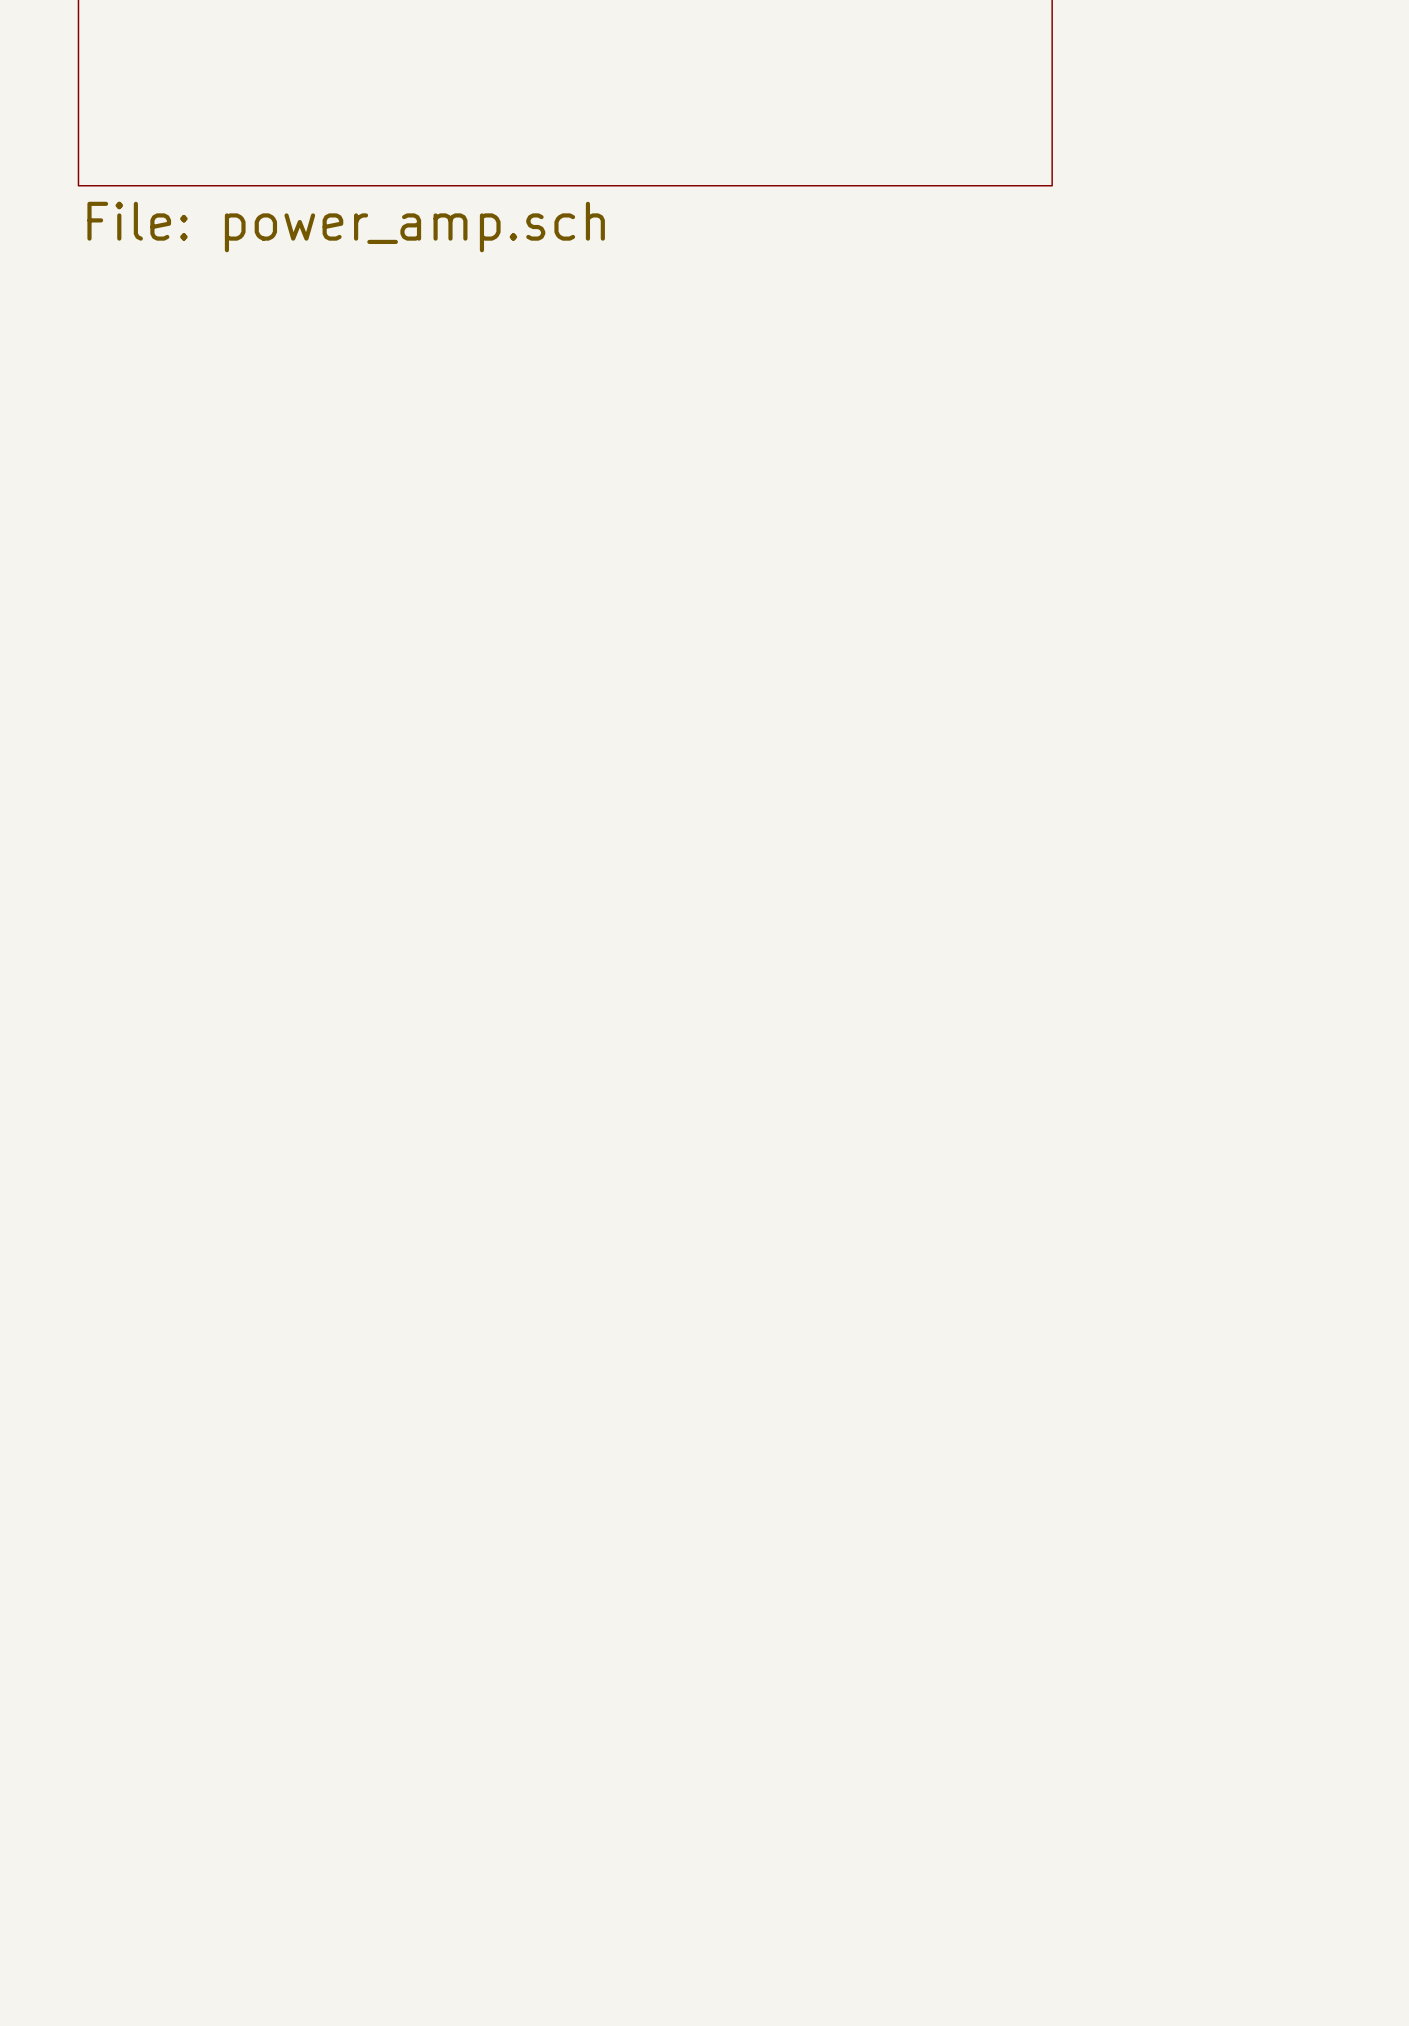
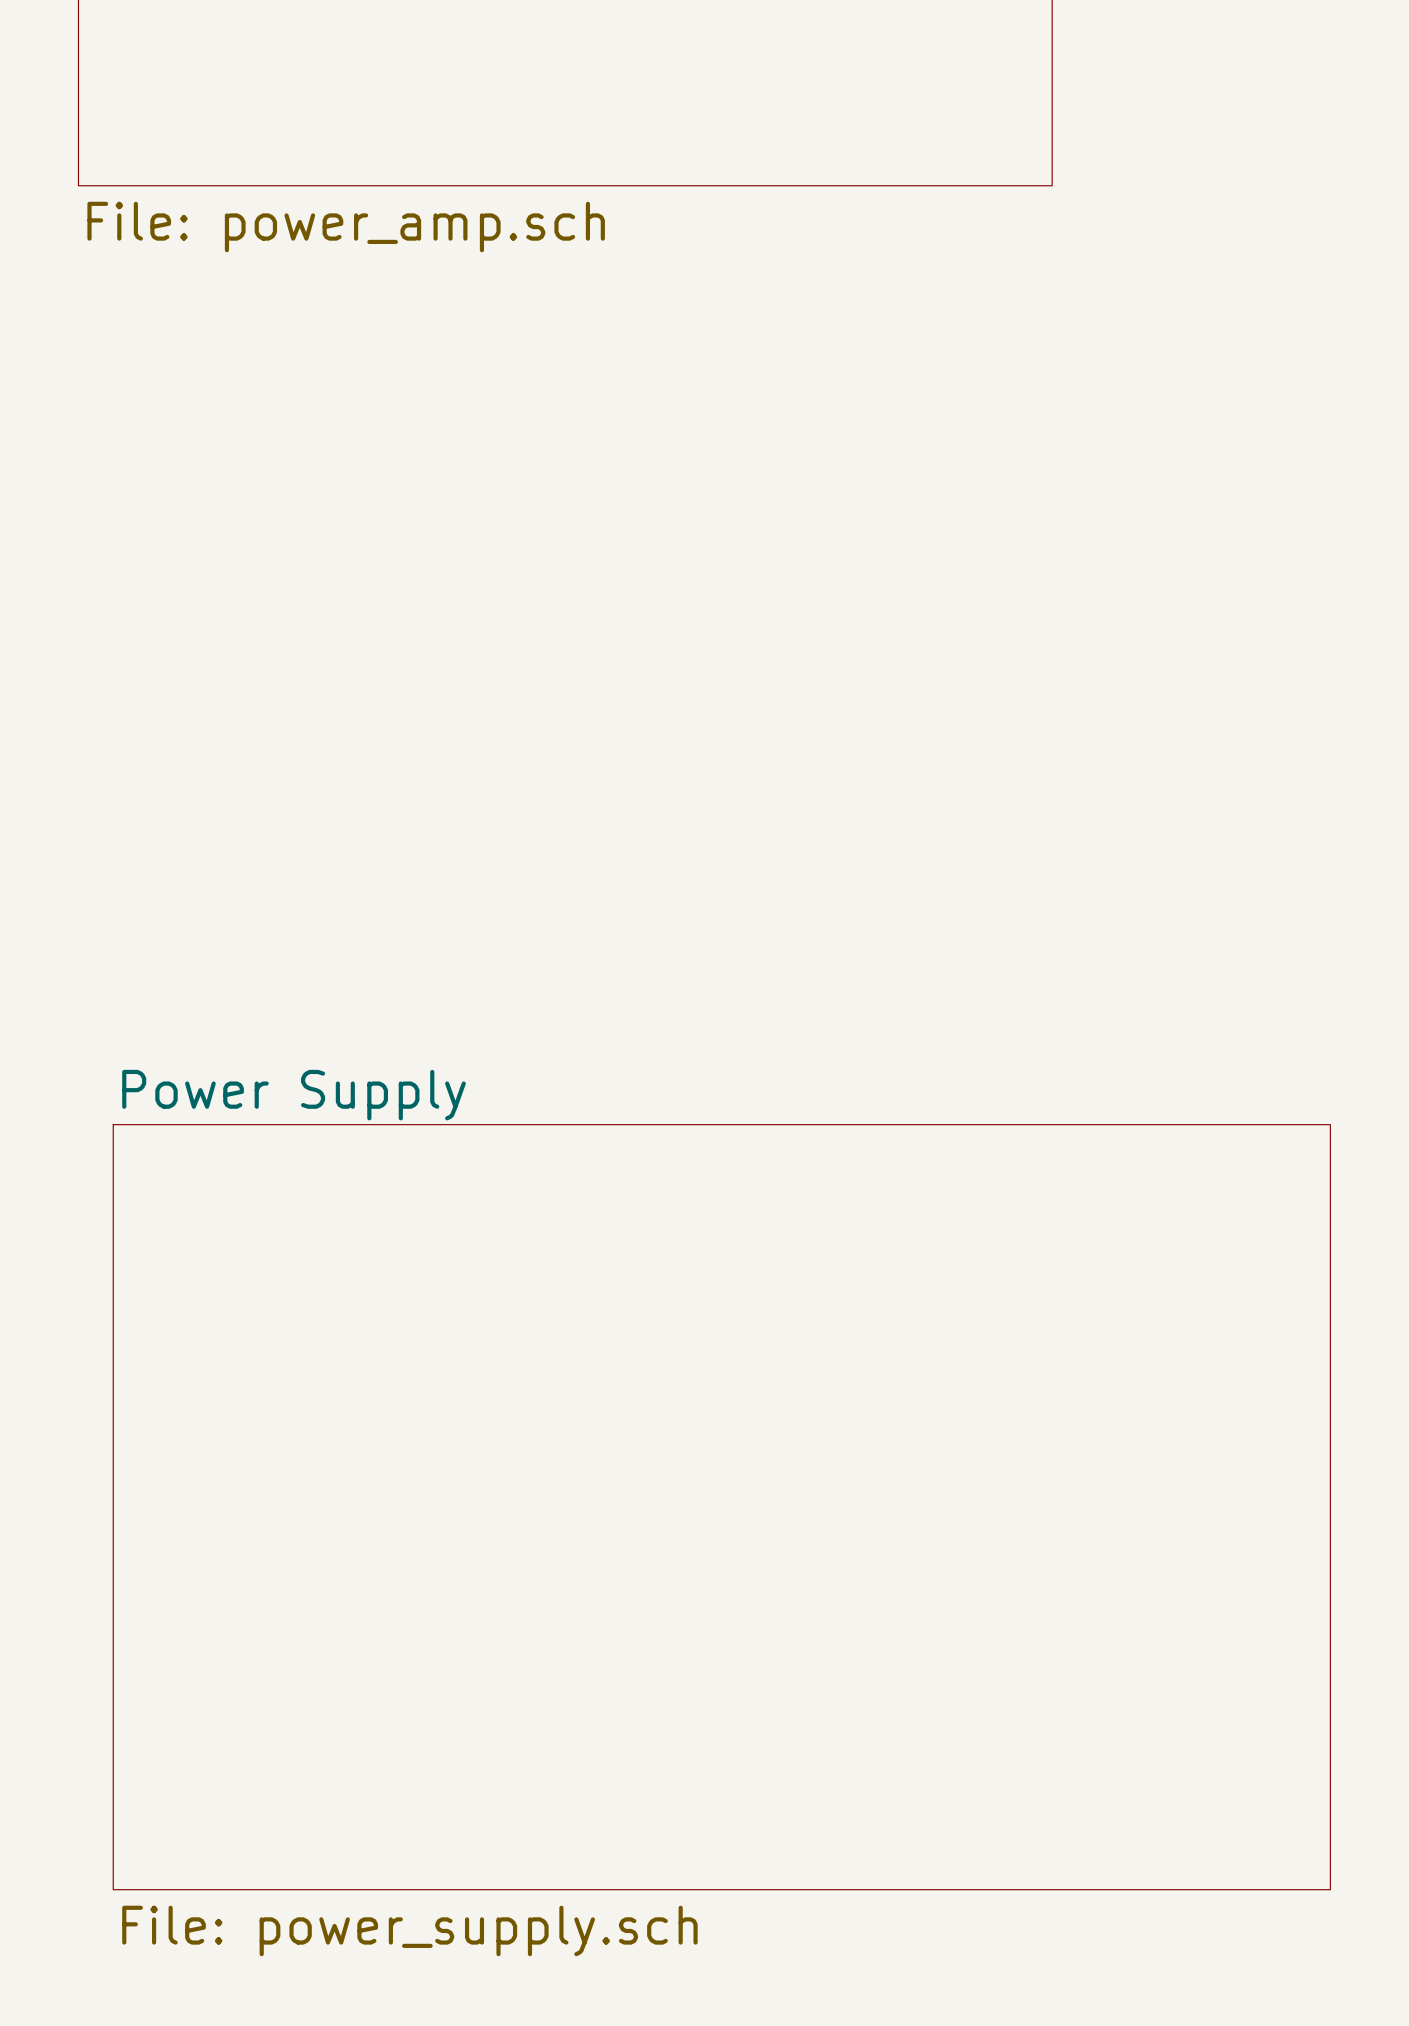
sheet Power Supply: none -> File: power_supply.sch (721, 1507)

